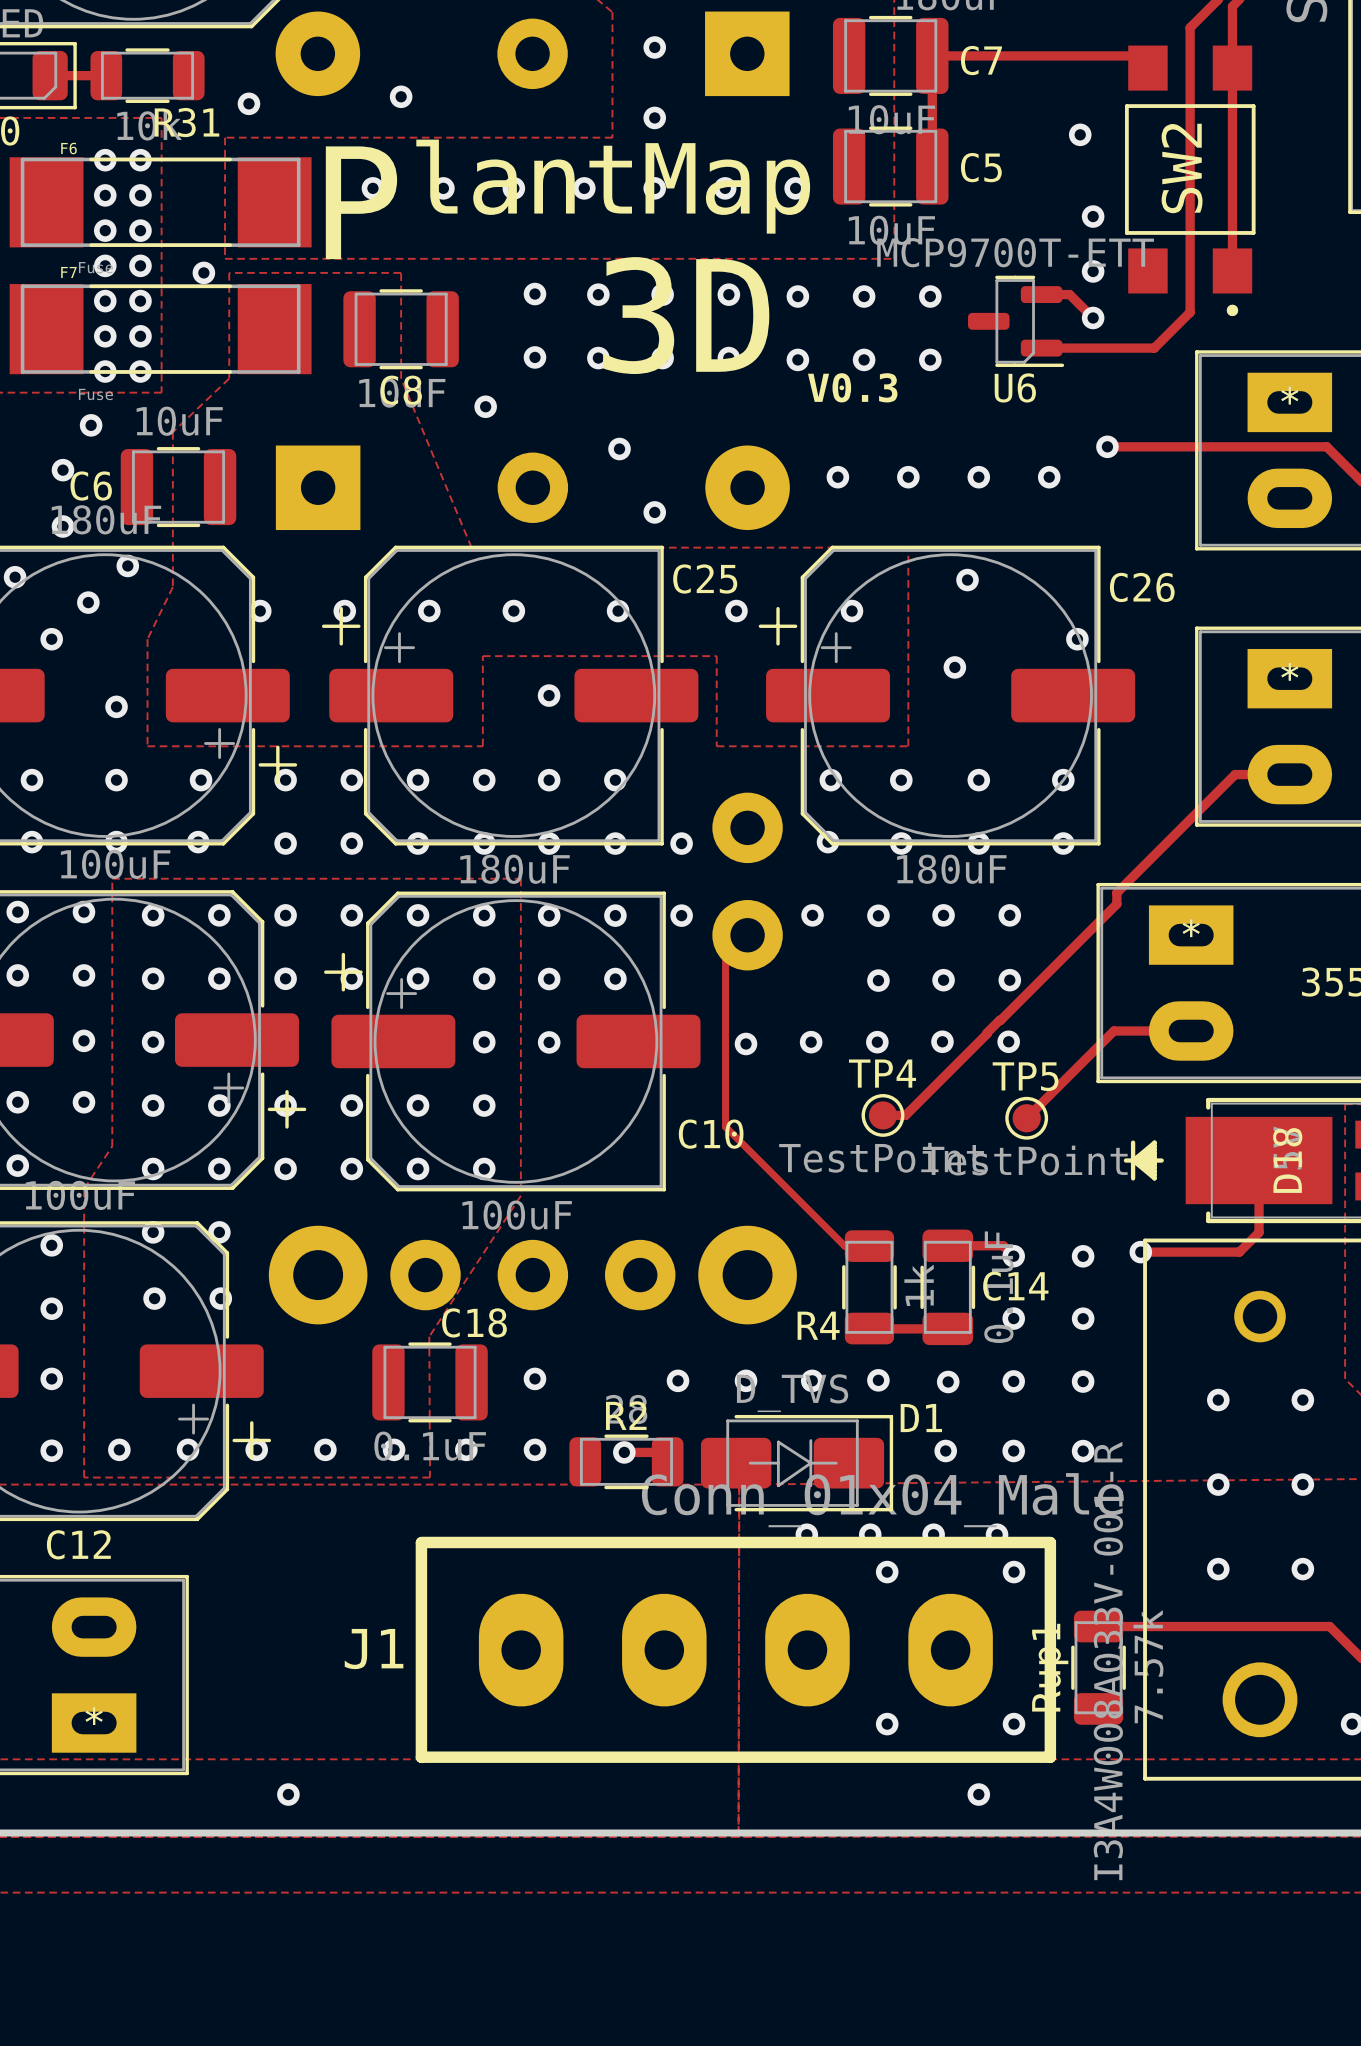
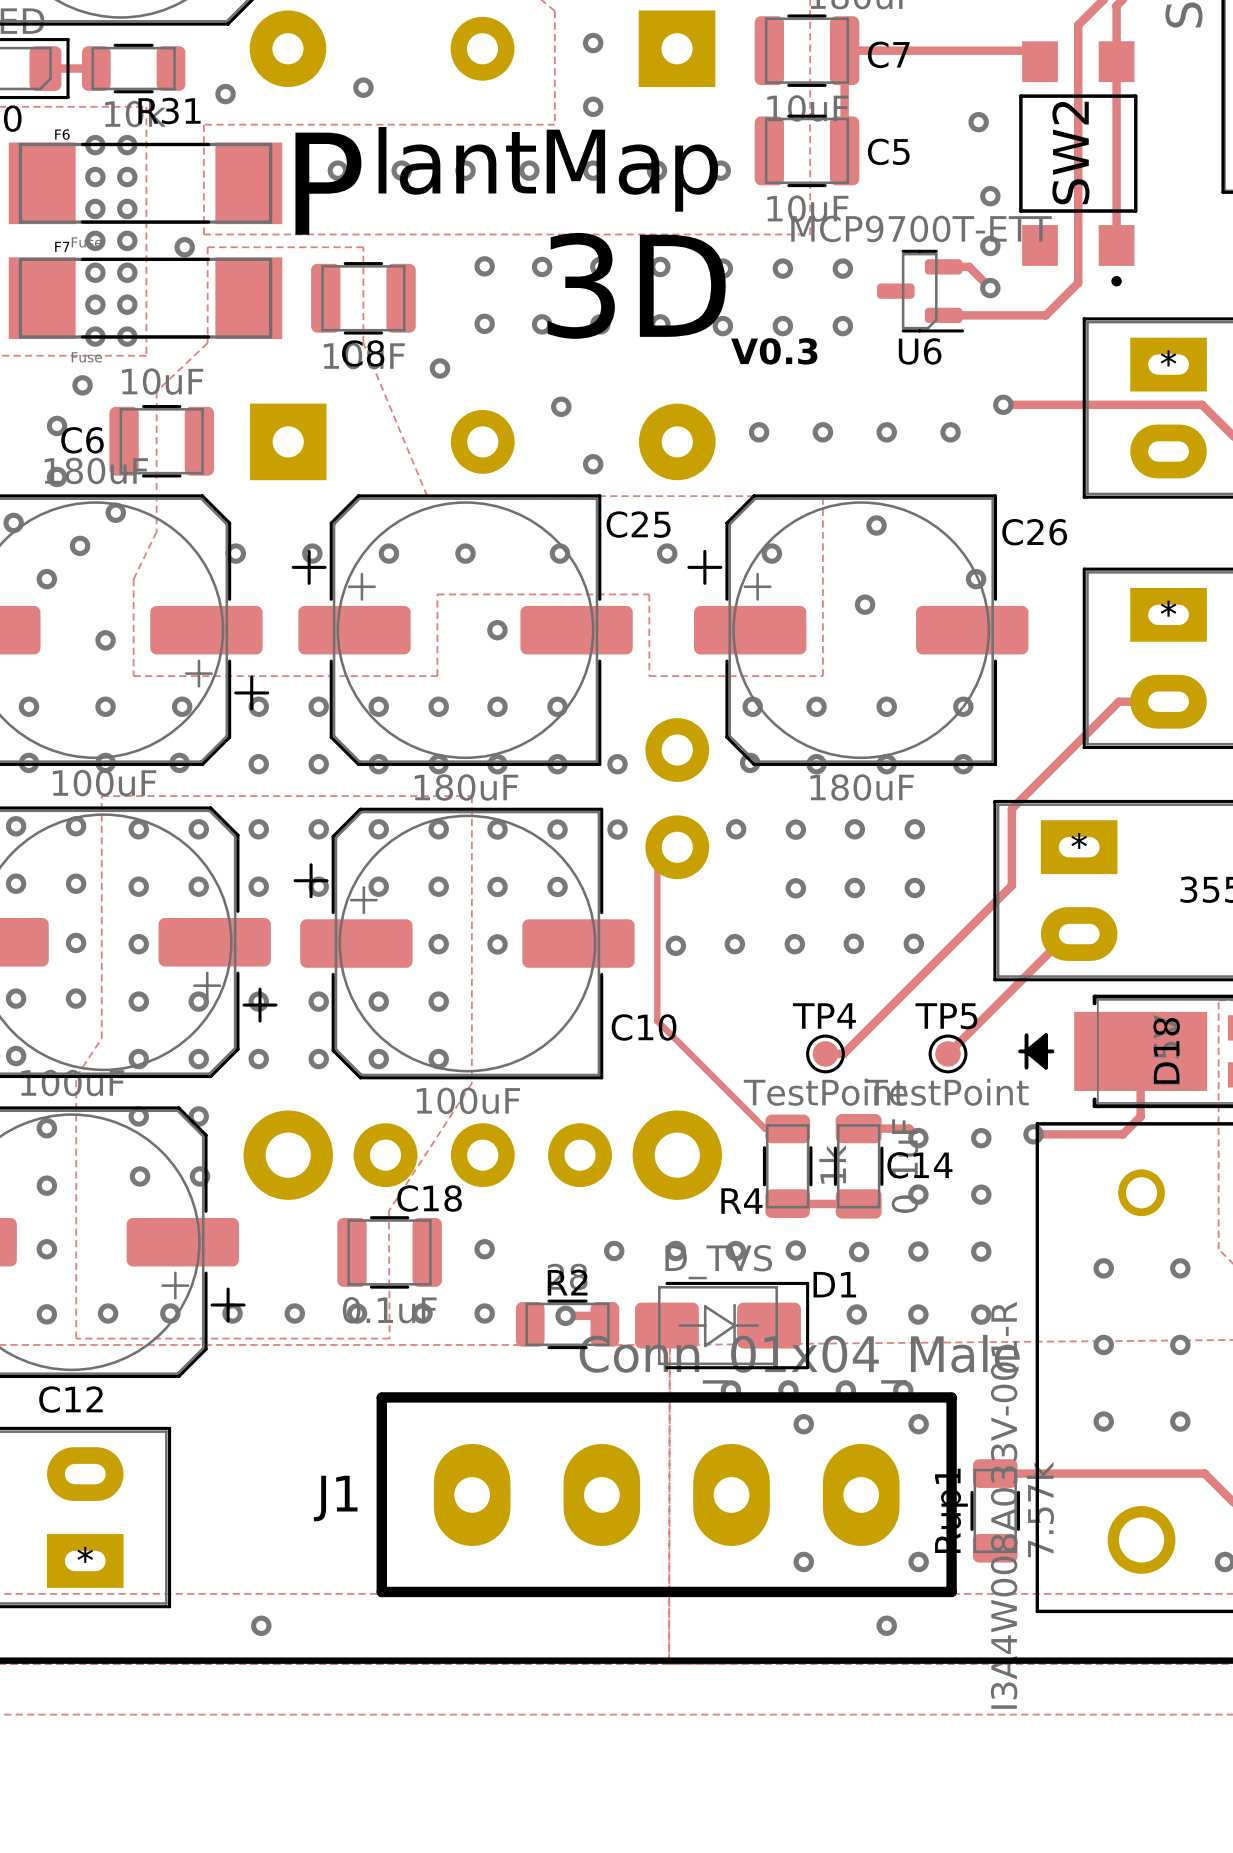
track: (1116, 904) (905, 1115) (882, 1115) -> (1011, 819) (1011, 885) (843, 1053) (825, 1053)
track: (1178, 1031) (1113, 1031) (1026, 1118) -> (1067, 934) (948, 1053)
TP4 position: (882, 1115) -> (825, 1053)
TP5 position: (1026, 1118) -> (948, 1053)

